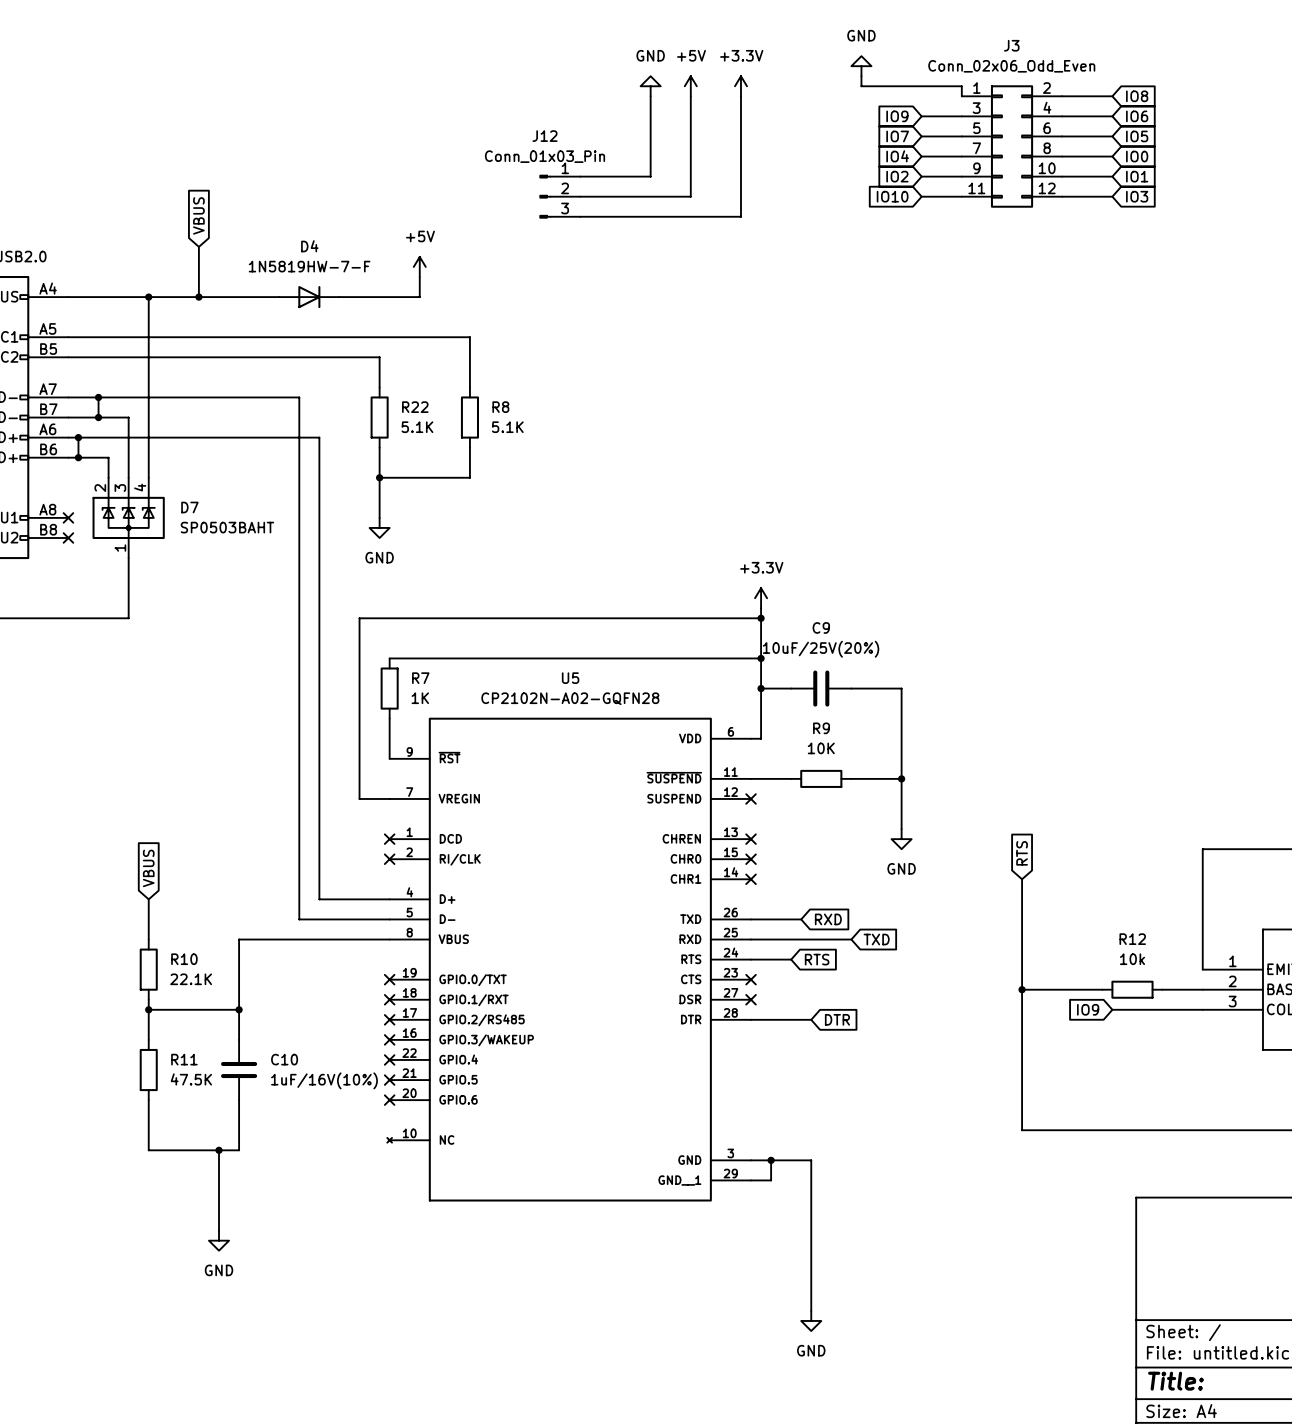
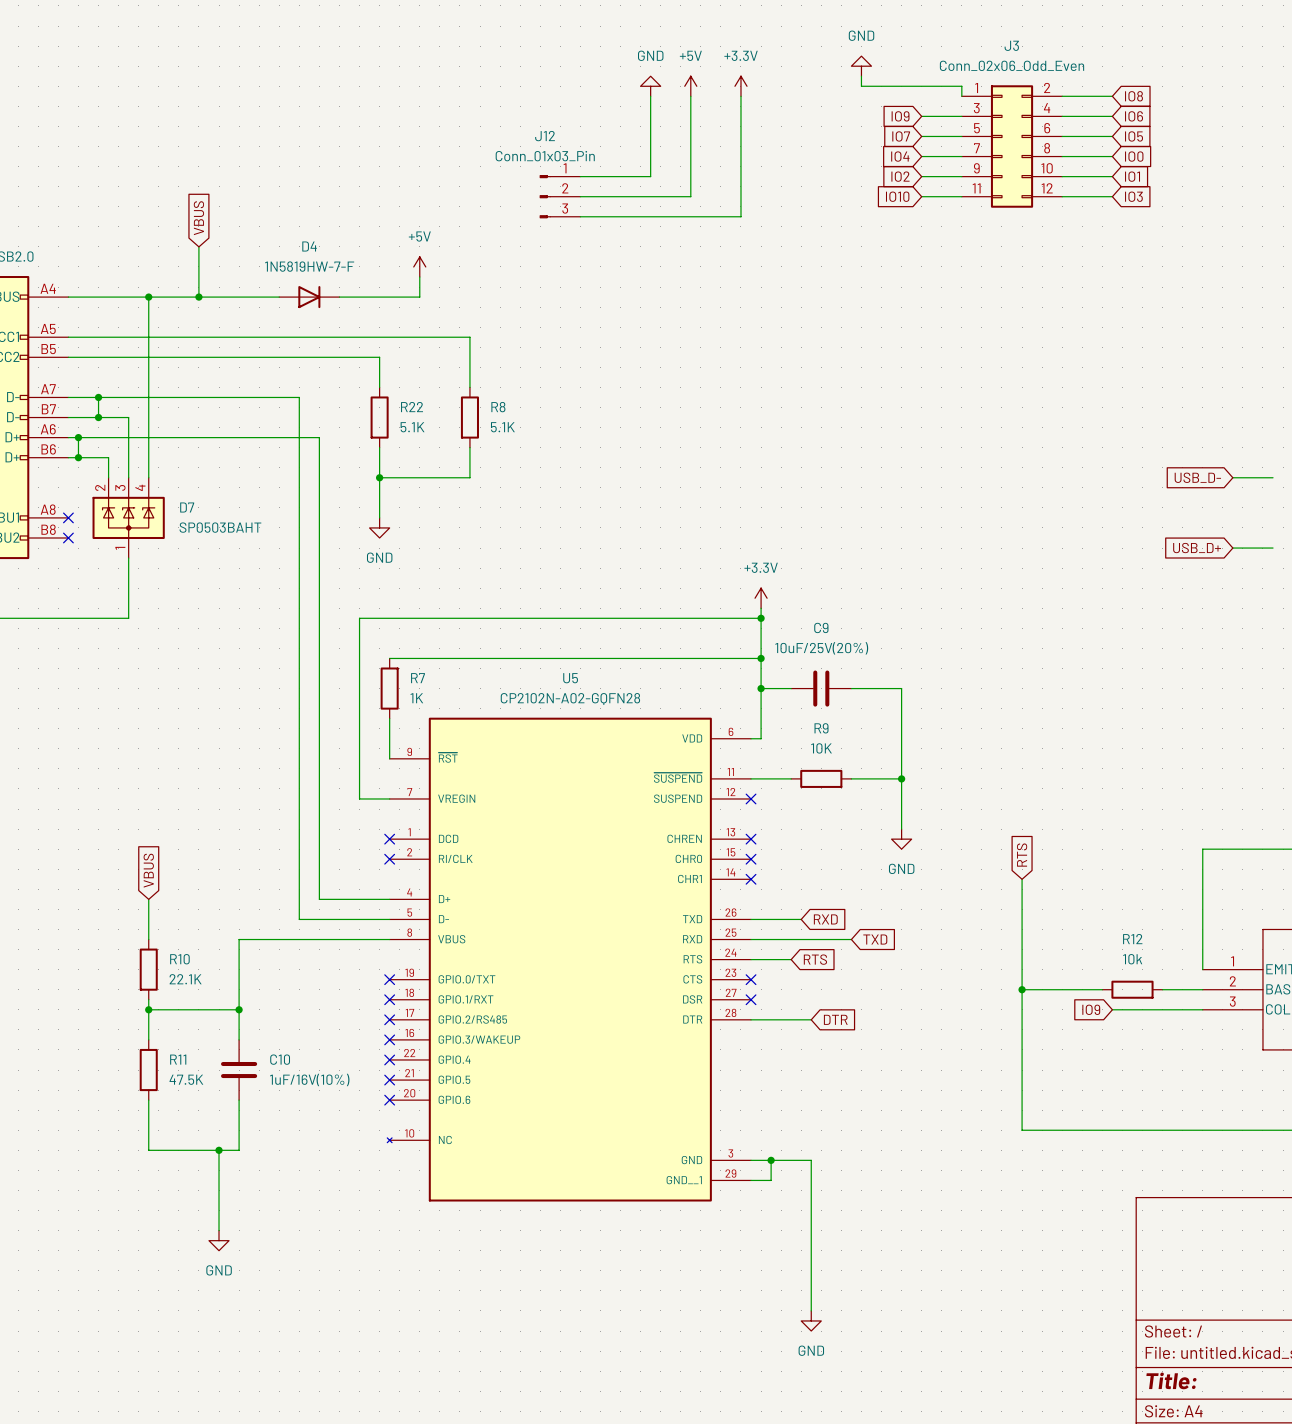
wire: none -> (1232, 477) (1273, 477)
global label: none -> USB_D- (1197, 477)
global label: none -> USB_D+ (1197, 548)
wire: none -> (1232, 548) (1273, 548)

